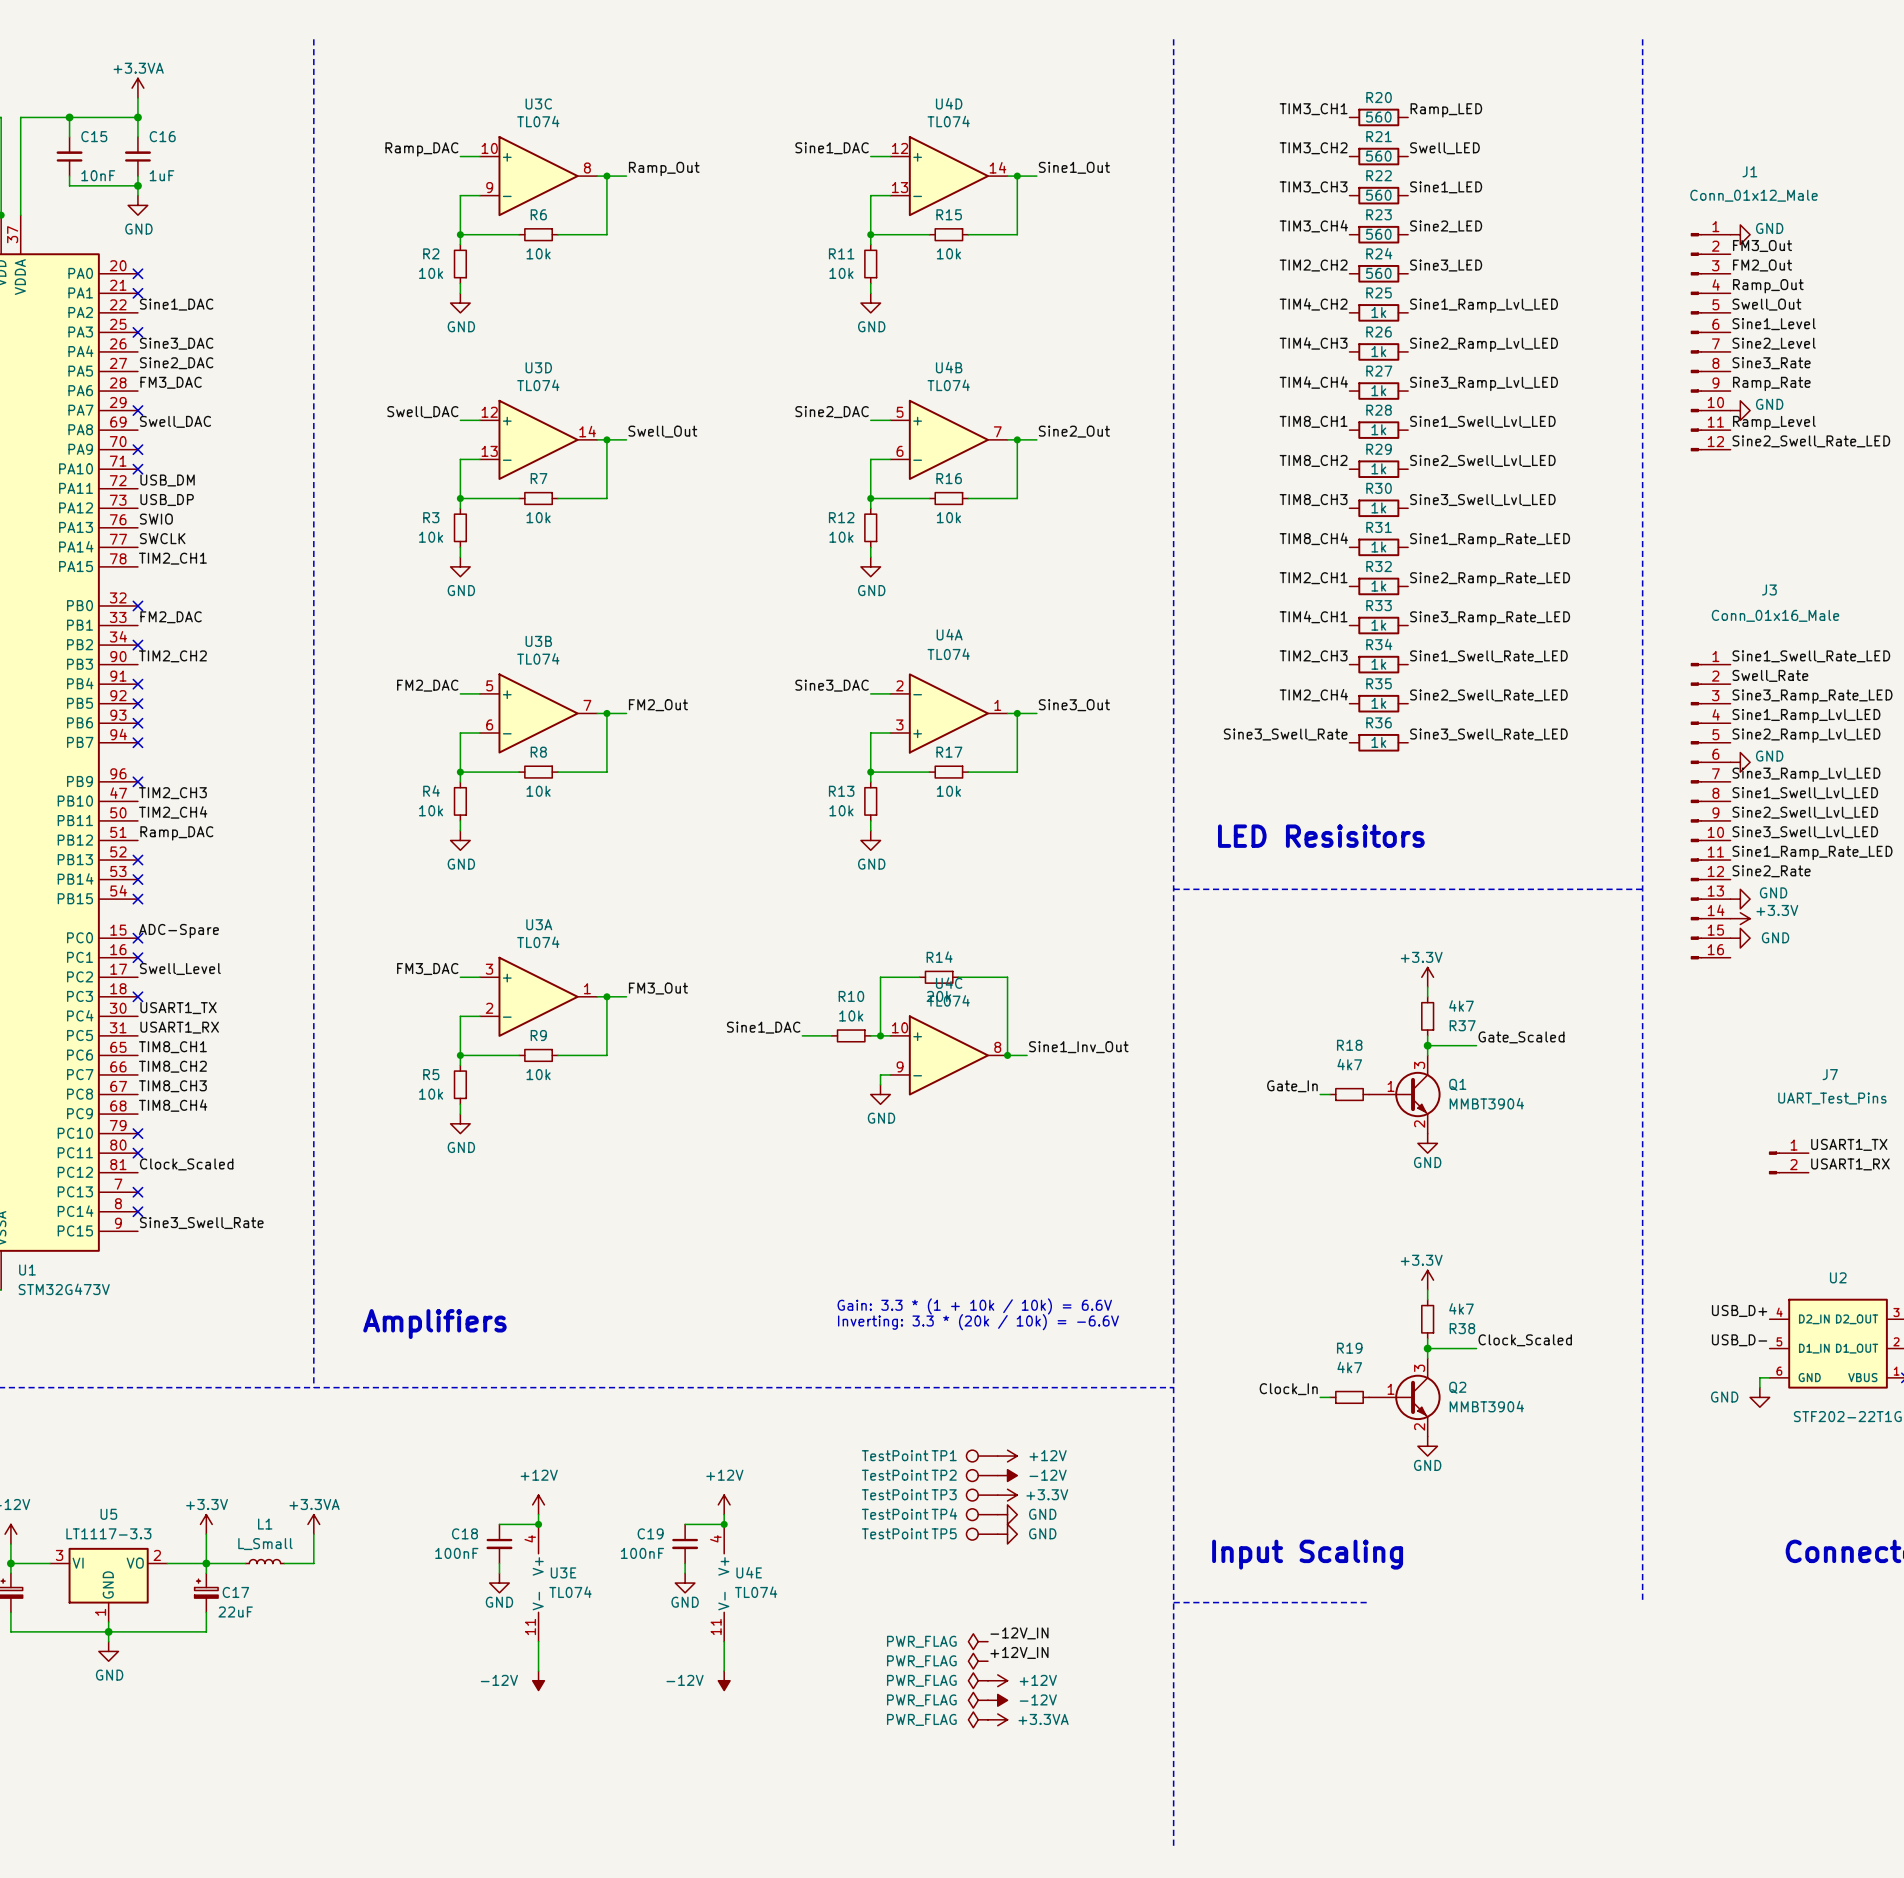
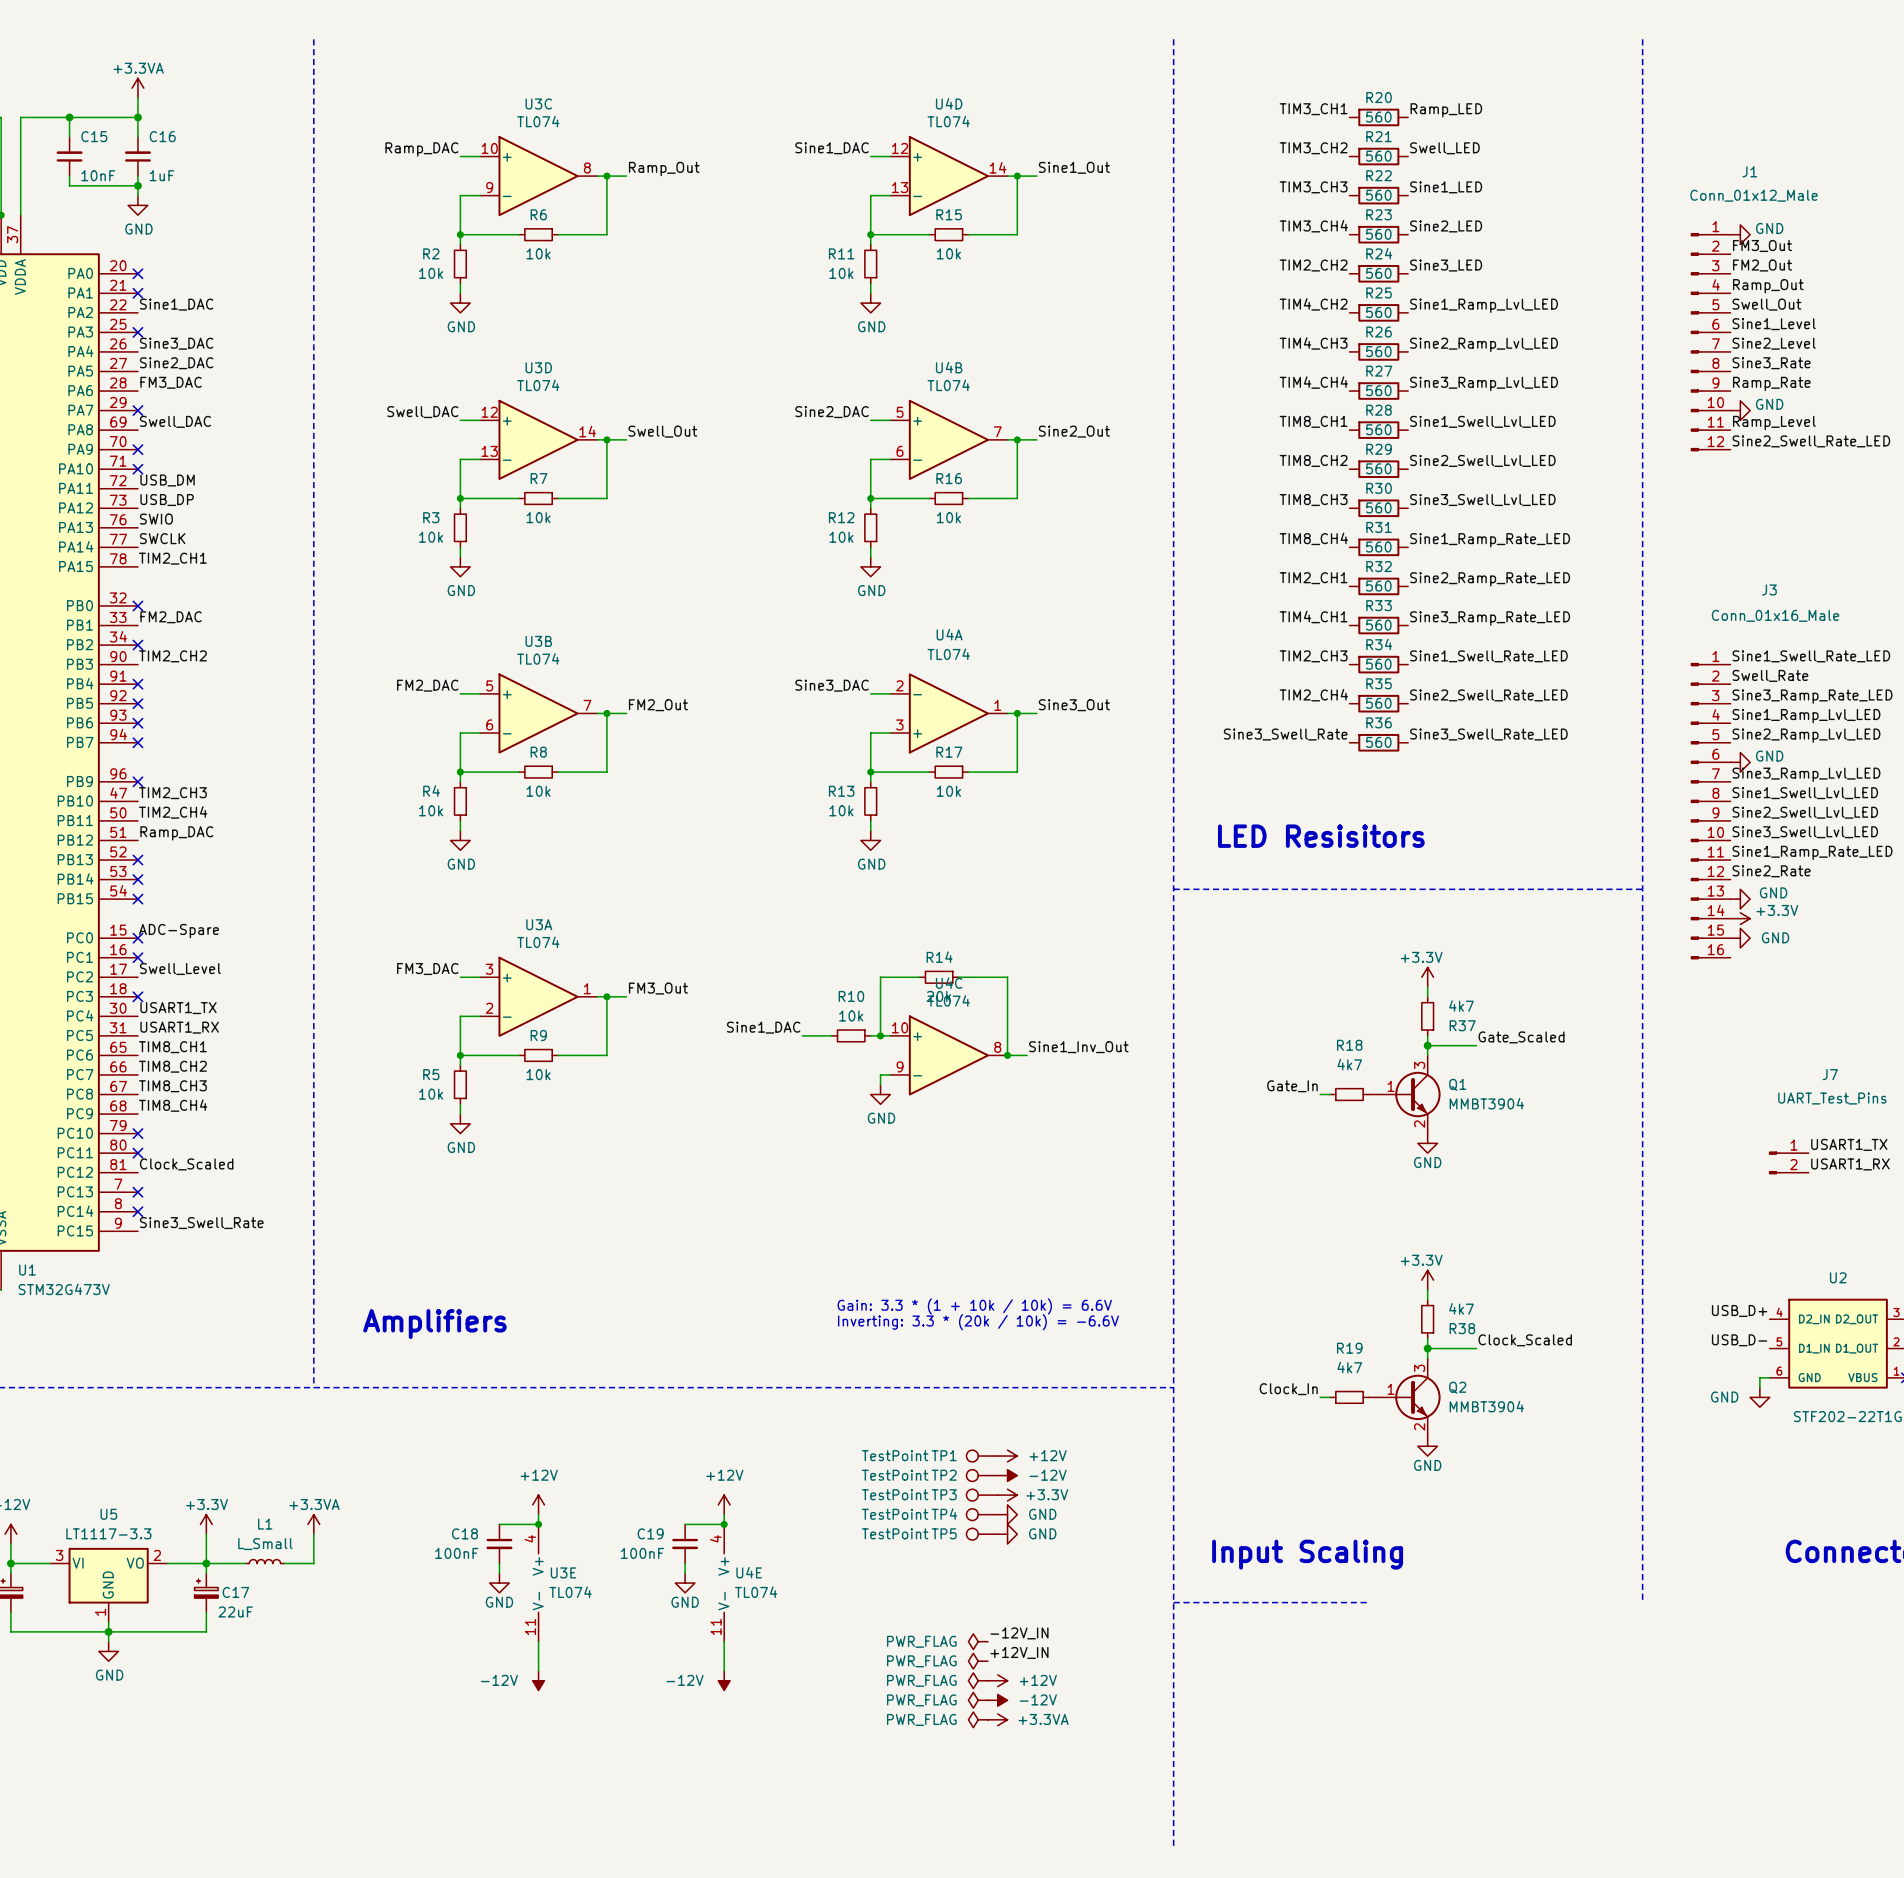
R25 value: 1k (1378, 312) -> 560 (1378, 312)
R26 value: 1k (1378, 351) -> 560 (1378, 351)
R27 value: 1k (1378, 390) -> 560 (1378, 390)
R28 value: 1k (1378, 429) -> 560 (1378, 429)
R29 value: 1k (1378, 468) -> 560 (1378, 468)
R30 value: 1k (1378, 507) -> 560 (1378, 507)
R31 value: 1k (1378, 546) -> 560 (1378, 546)
R32 value: 1k (1378, 586) -> 560 (1378, 586)
R33 value: 1k (1378, 625) -> 560 (1378, 625)
R34 value: 1k (1378, 664) -> 560 (1378, 664)
R35 value: 1k (1378, 703) -> 560 (1378, 703)
R36 value: 1k (1378, 742) -> 560 (1378, 742)

